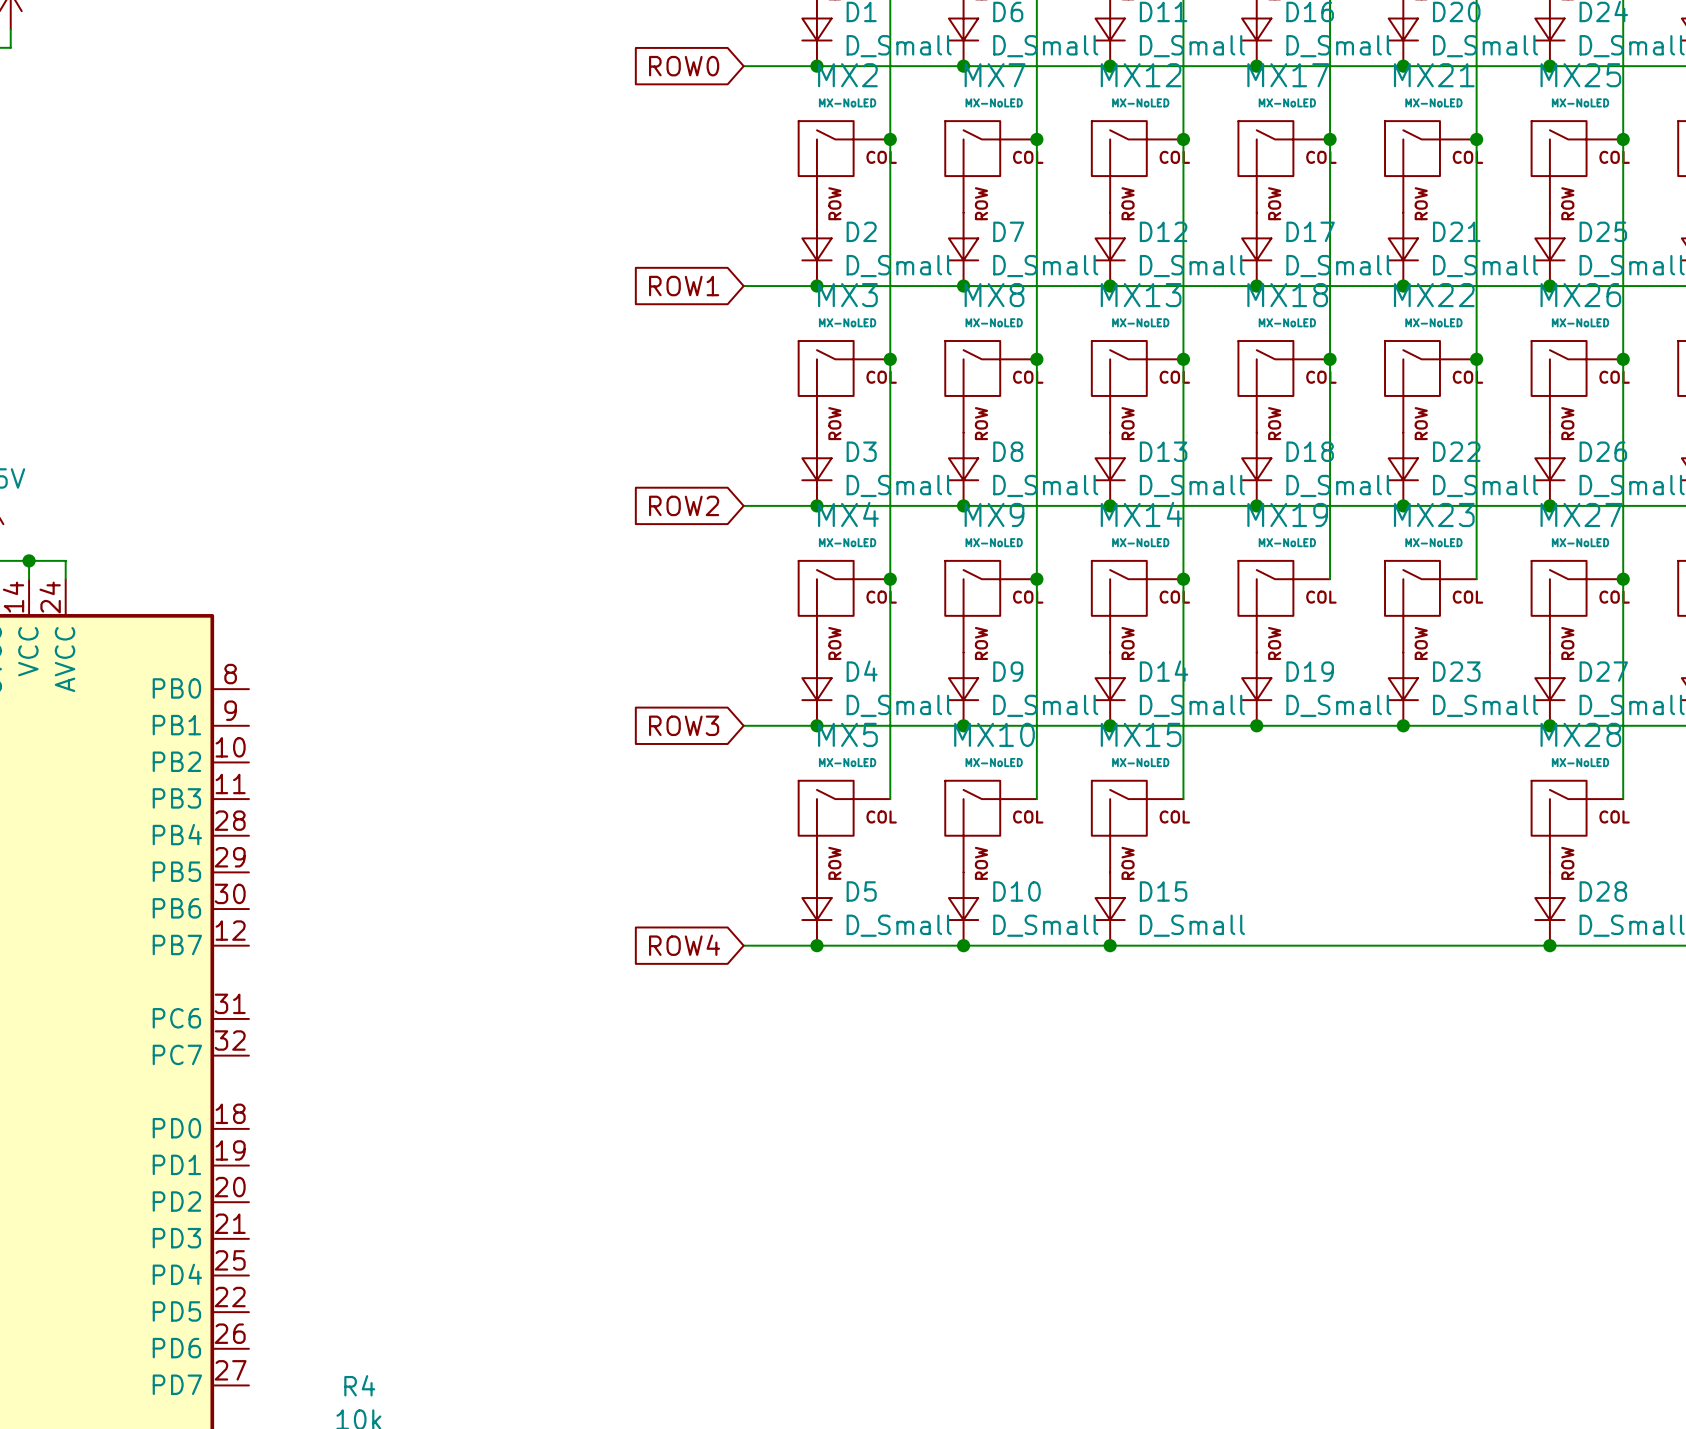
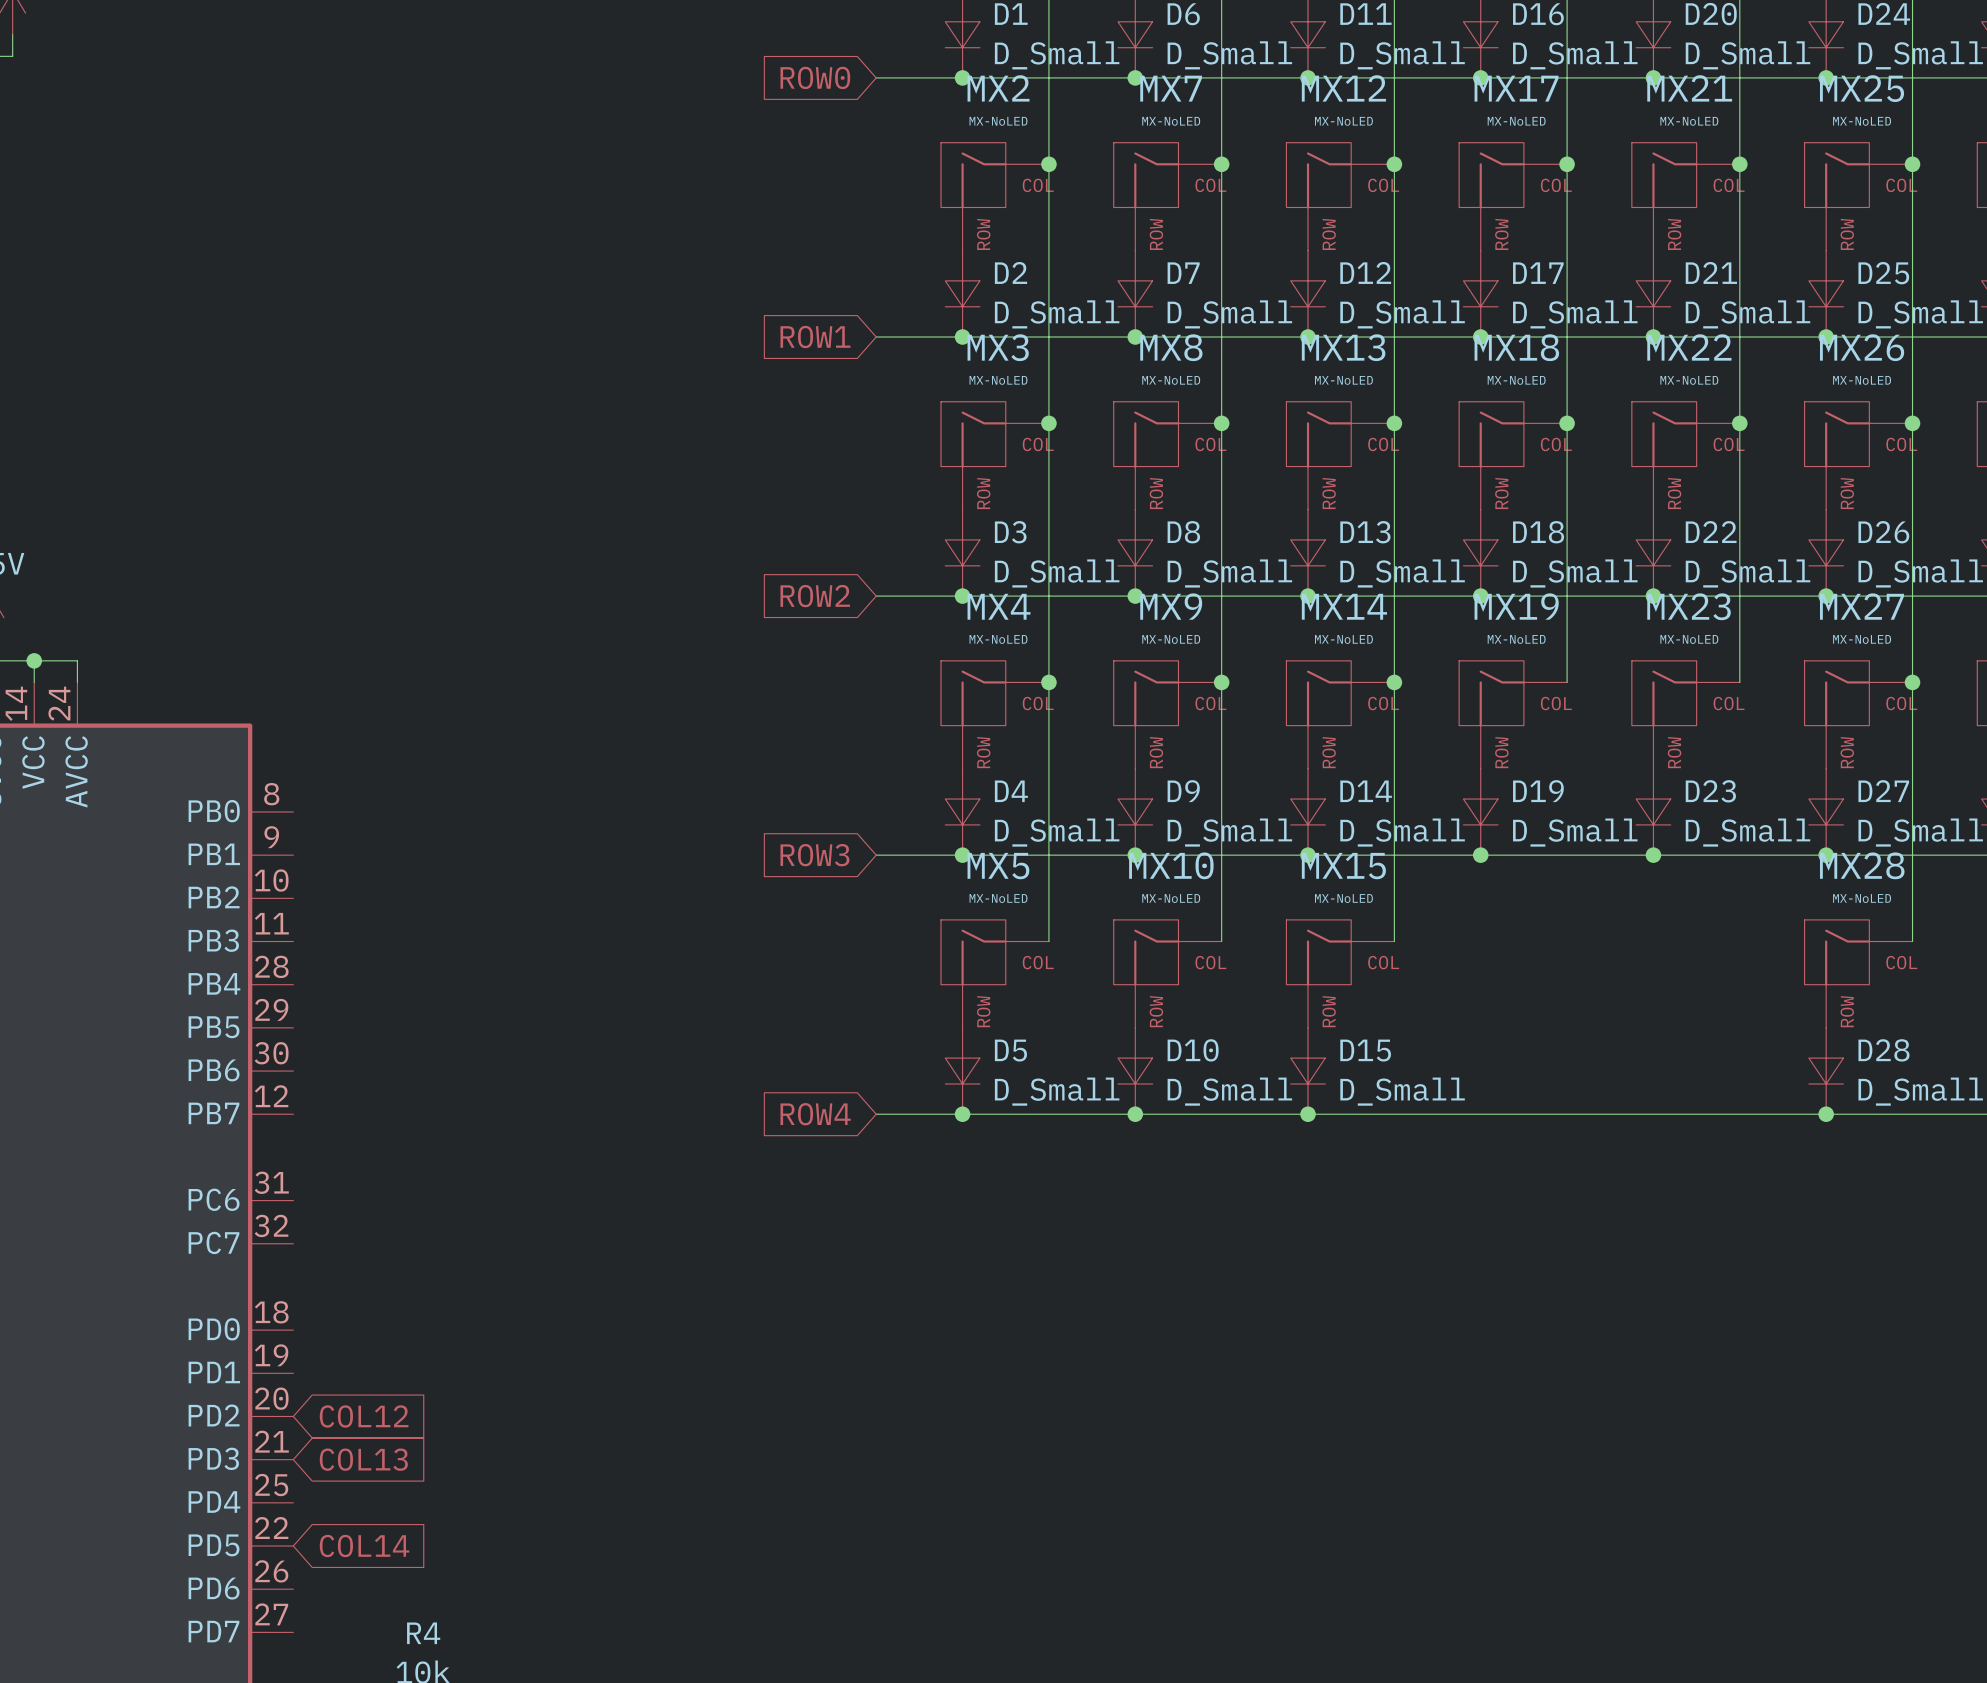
global label: none -> COL12 (364, 1416)
global label: none -> COL13 (363, 1459)
global label: none -> COL14 (364, 1546)

